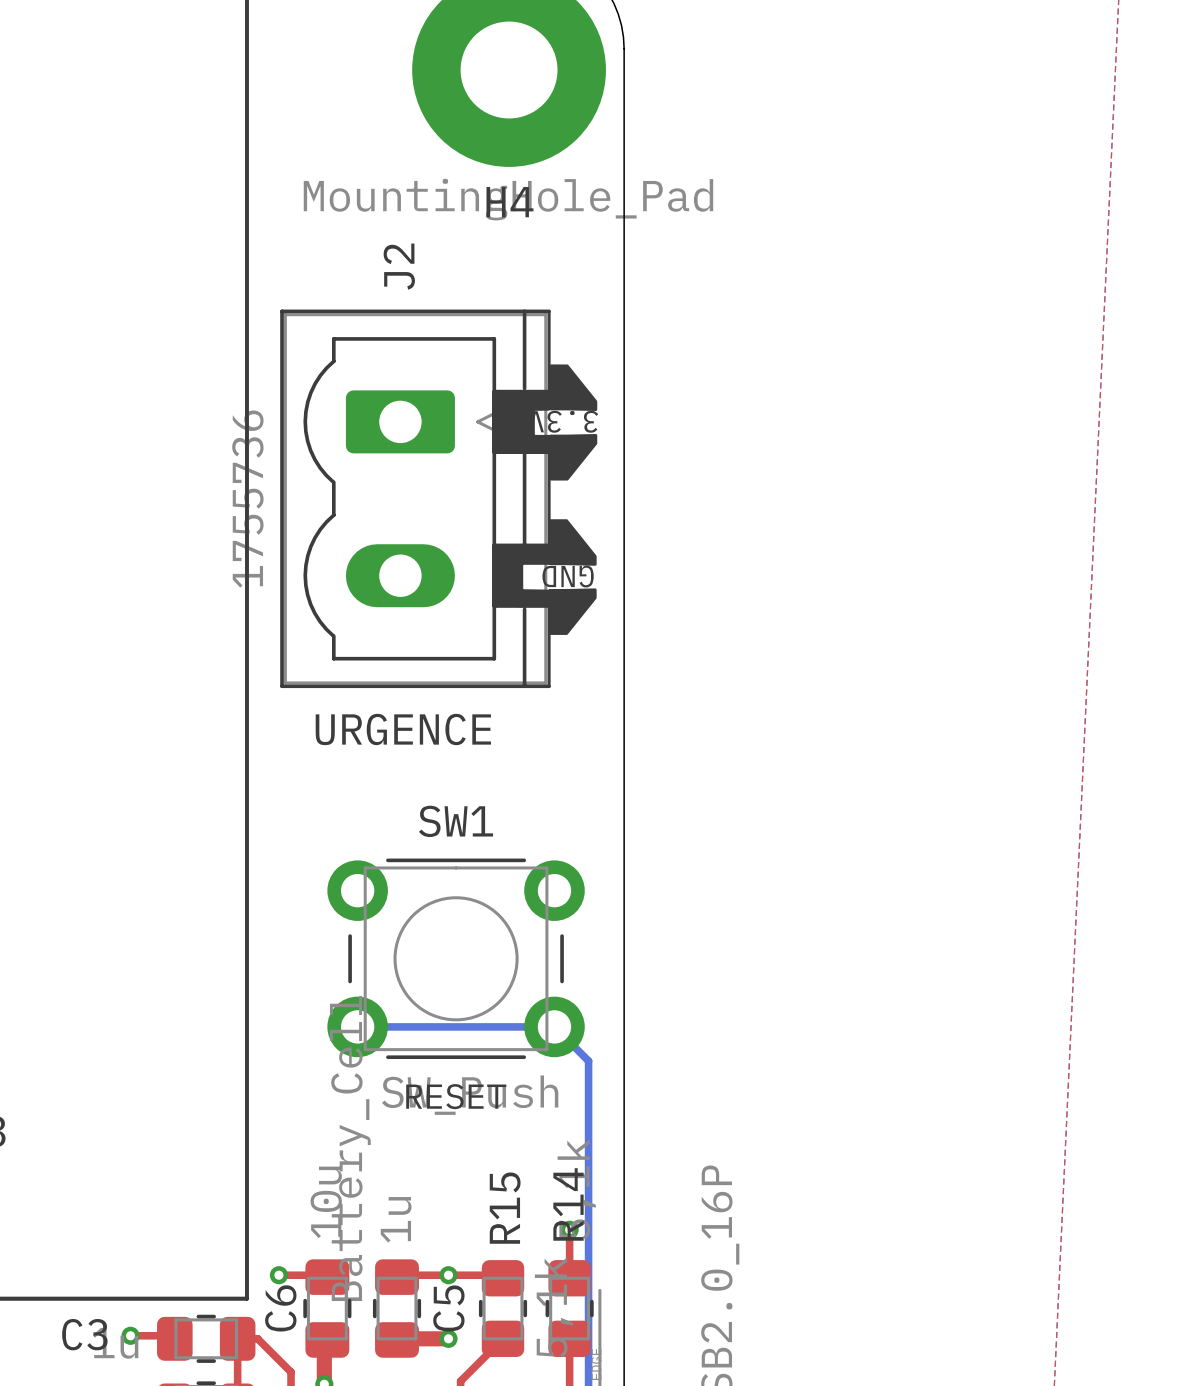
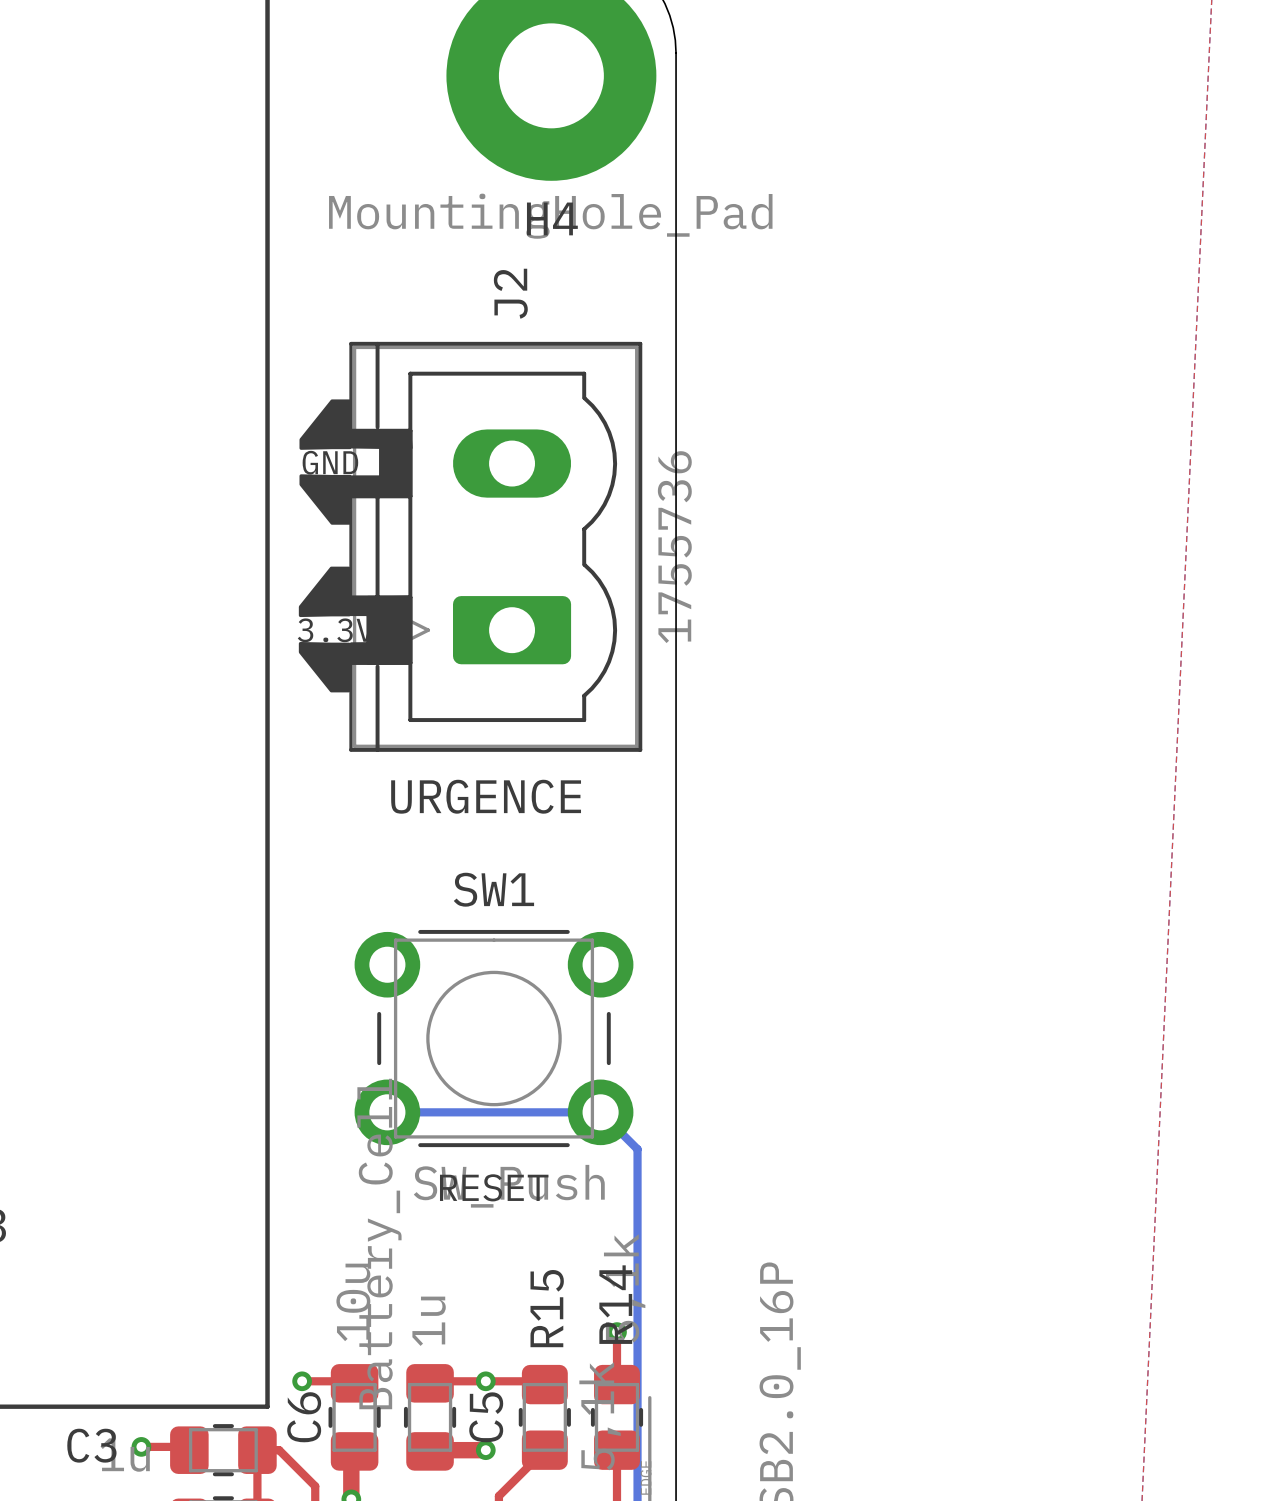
J2 name position: J2 (399, 266) -> J2 (510, 293)
J2 rotation: 0° (438, 498) -> 180° (470, 546)
text position: URGENCE (403, 729) -> URGENCE (486, 796)

